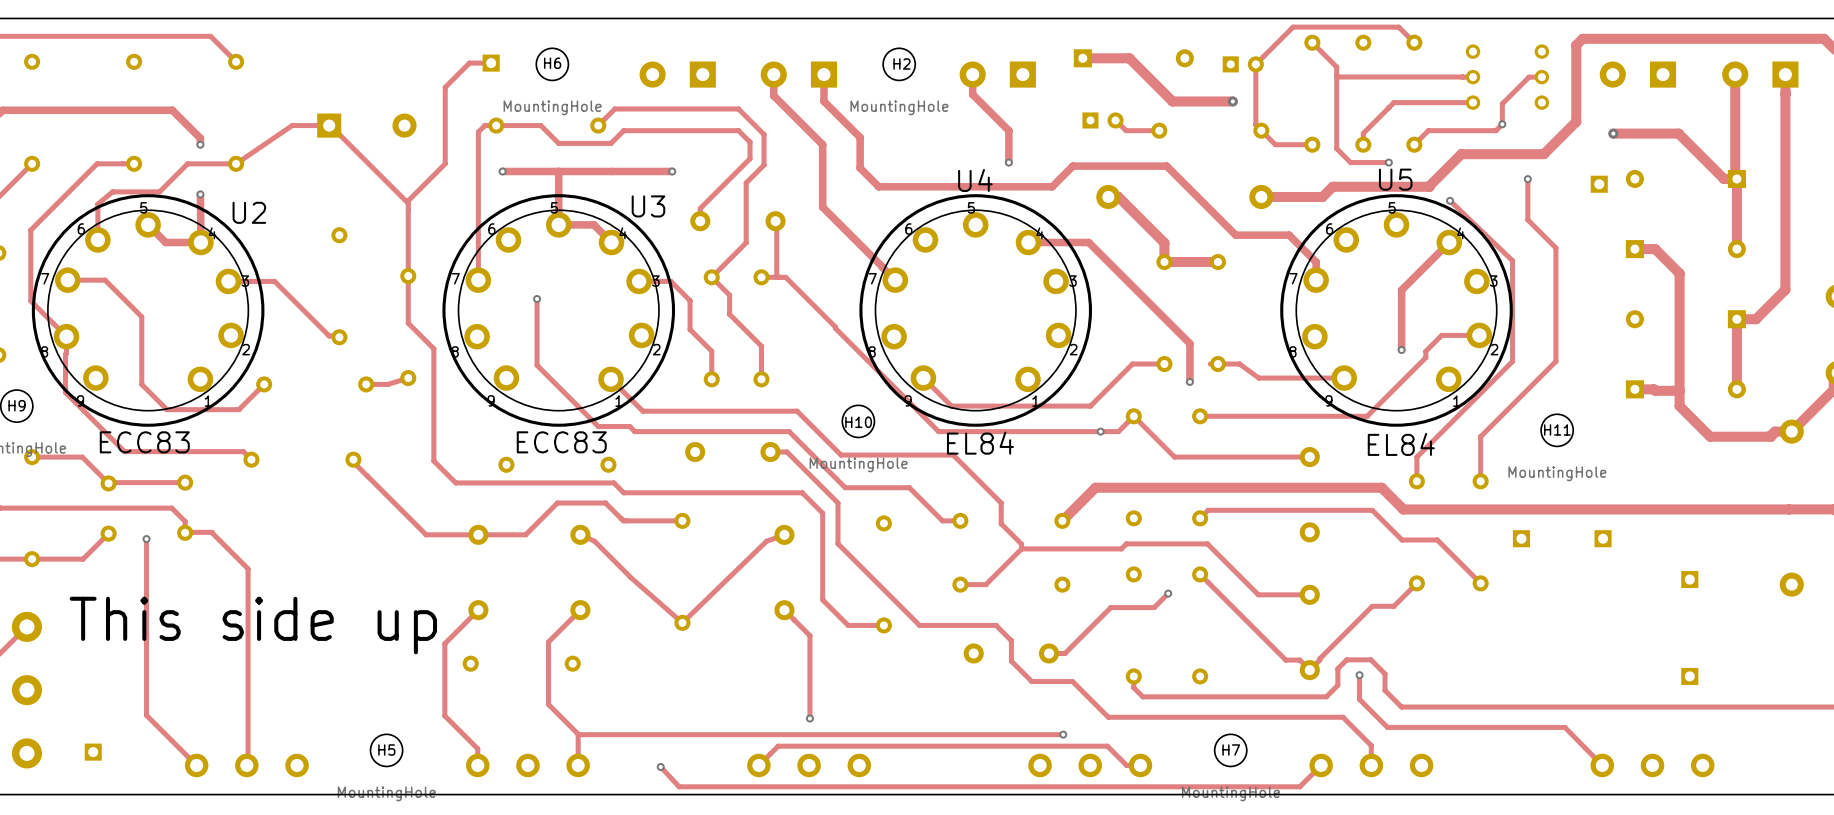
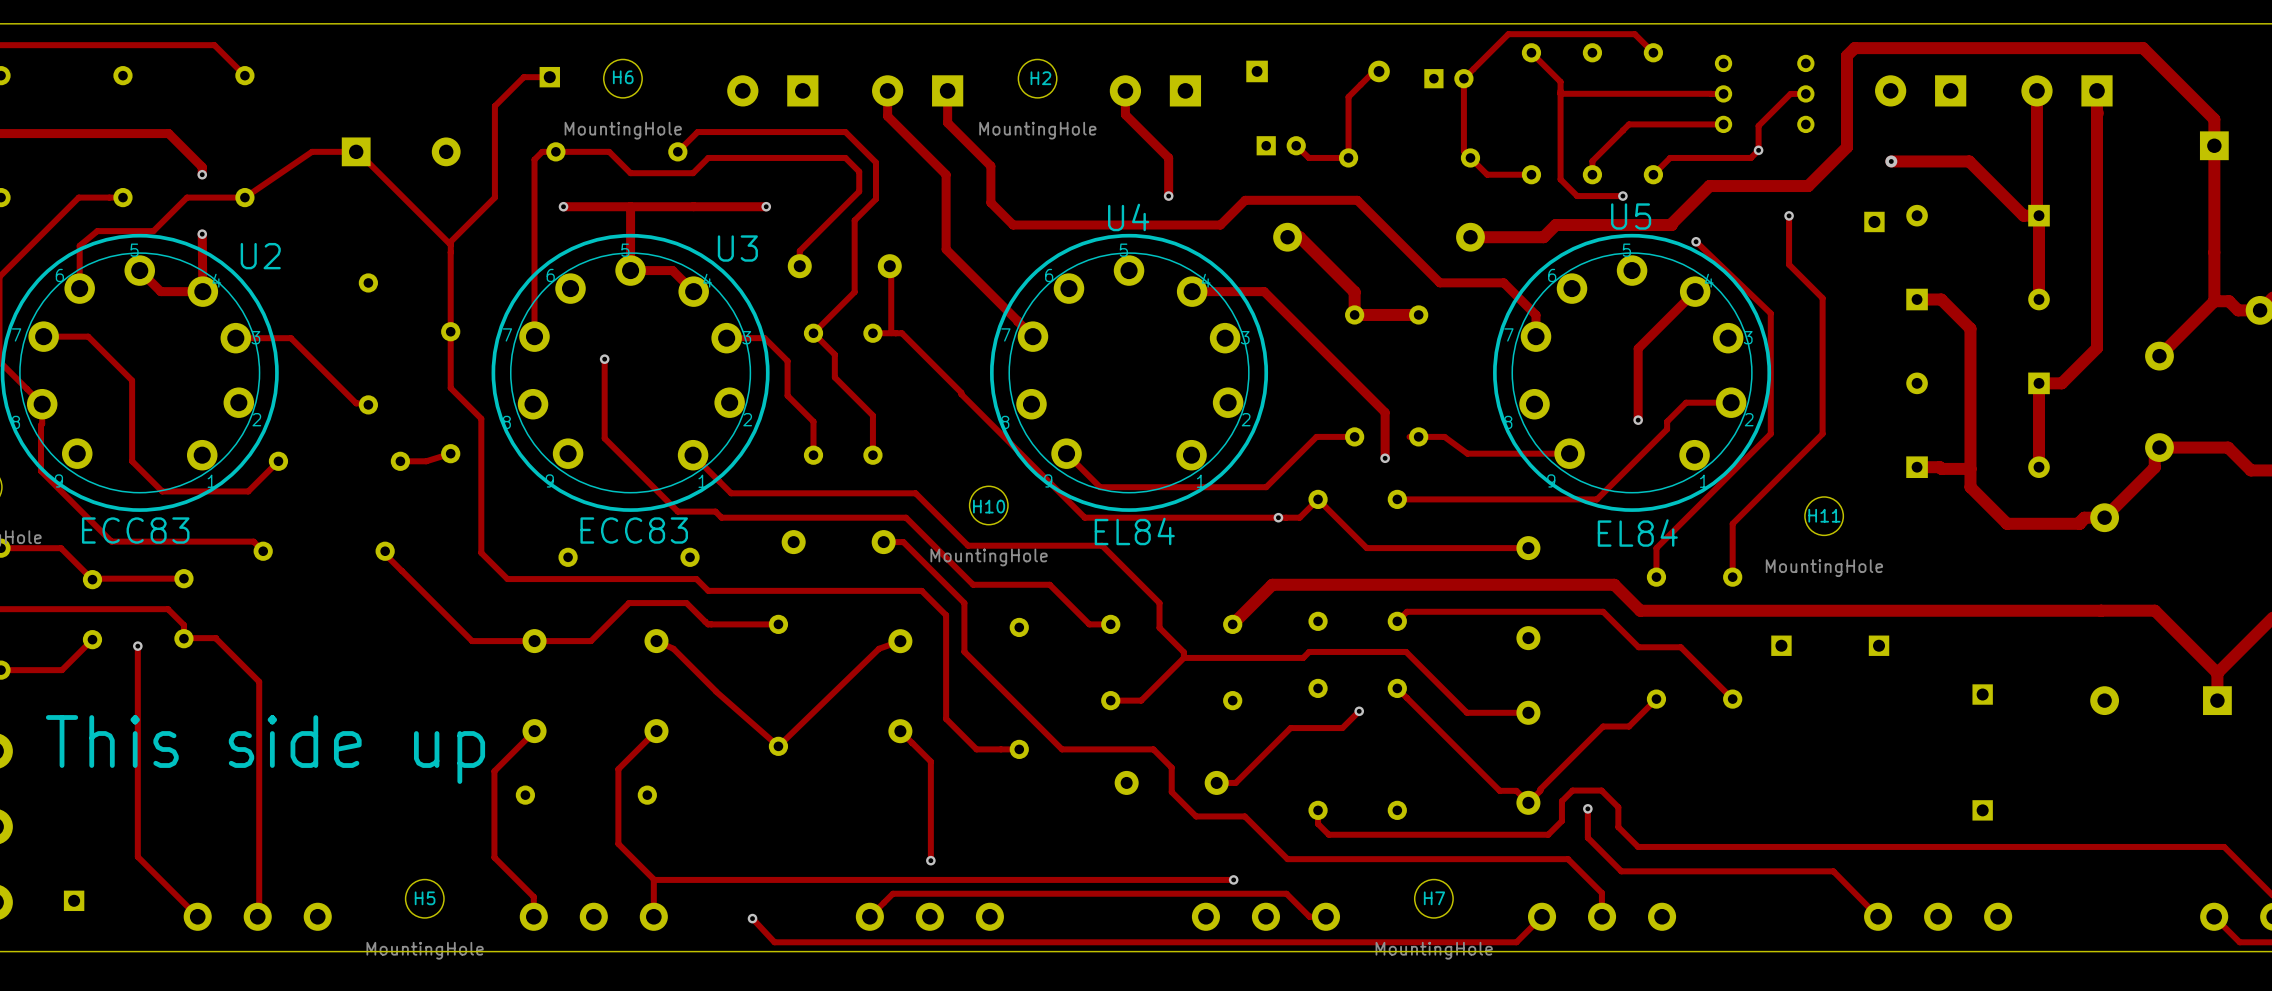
track: none -> (1379, 66) (1348, 96) (1348, 157)
track: (1082, 58) (1129, 58) (1172, 101) (1232, 101) -> none
via: (1232, 101) -> none

